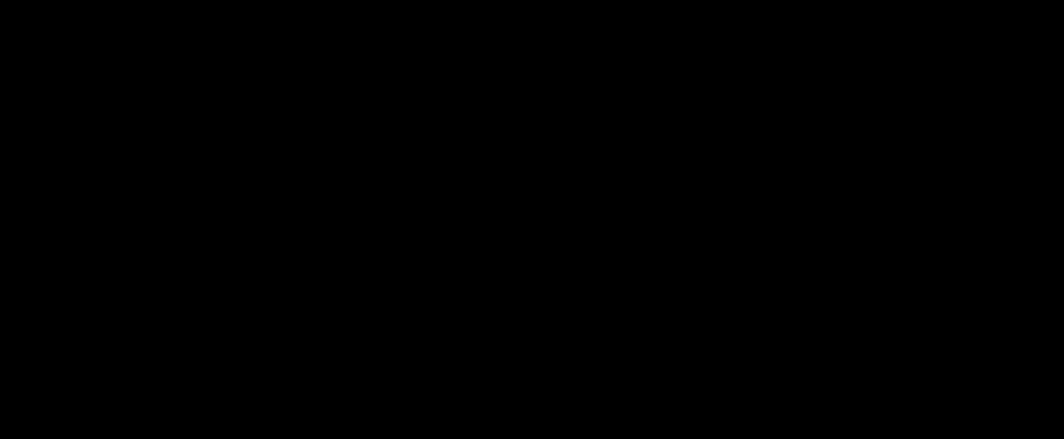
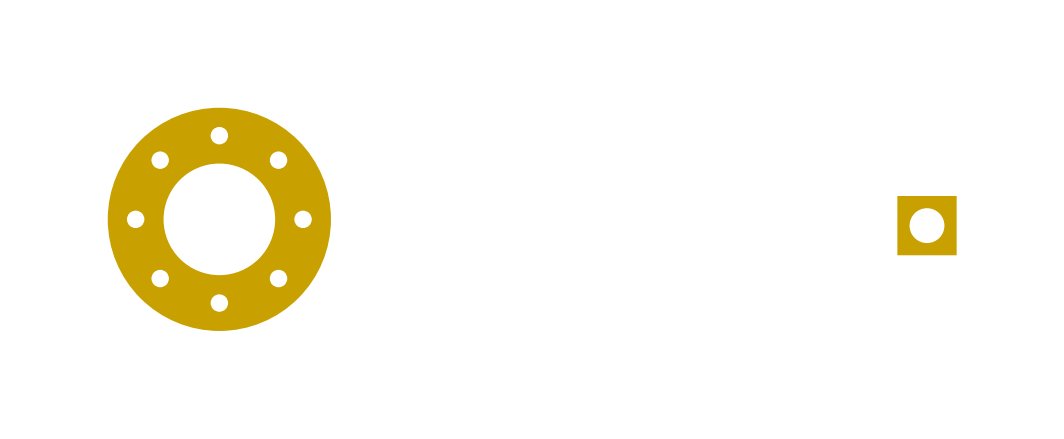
part: none -> (219, 219)
part: none -> (927, 225)

